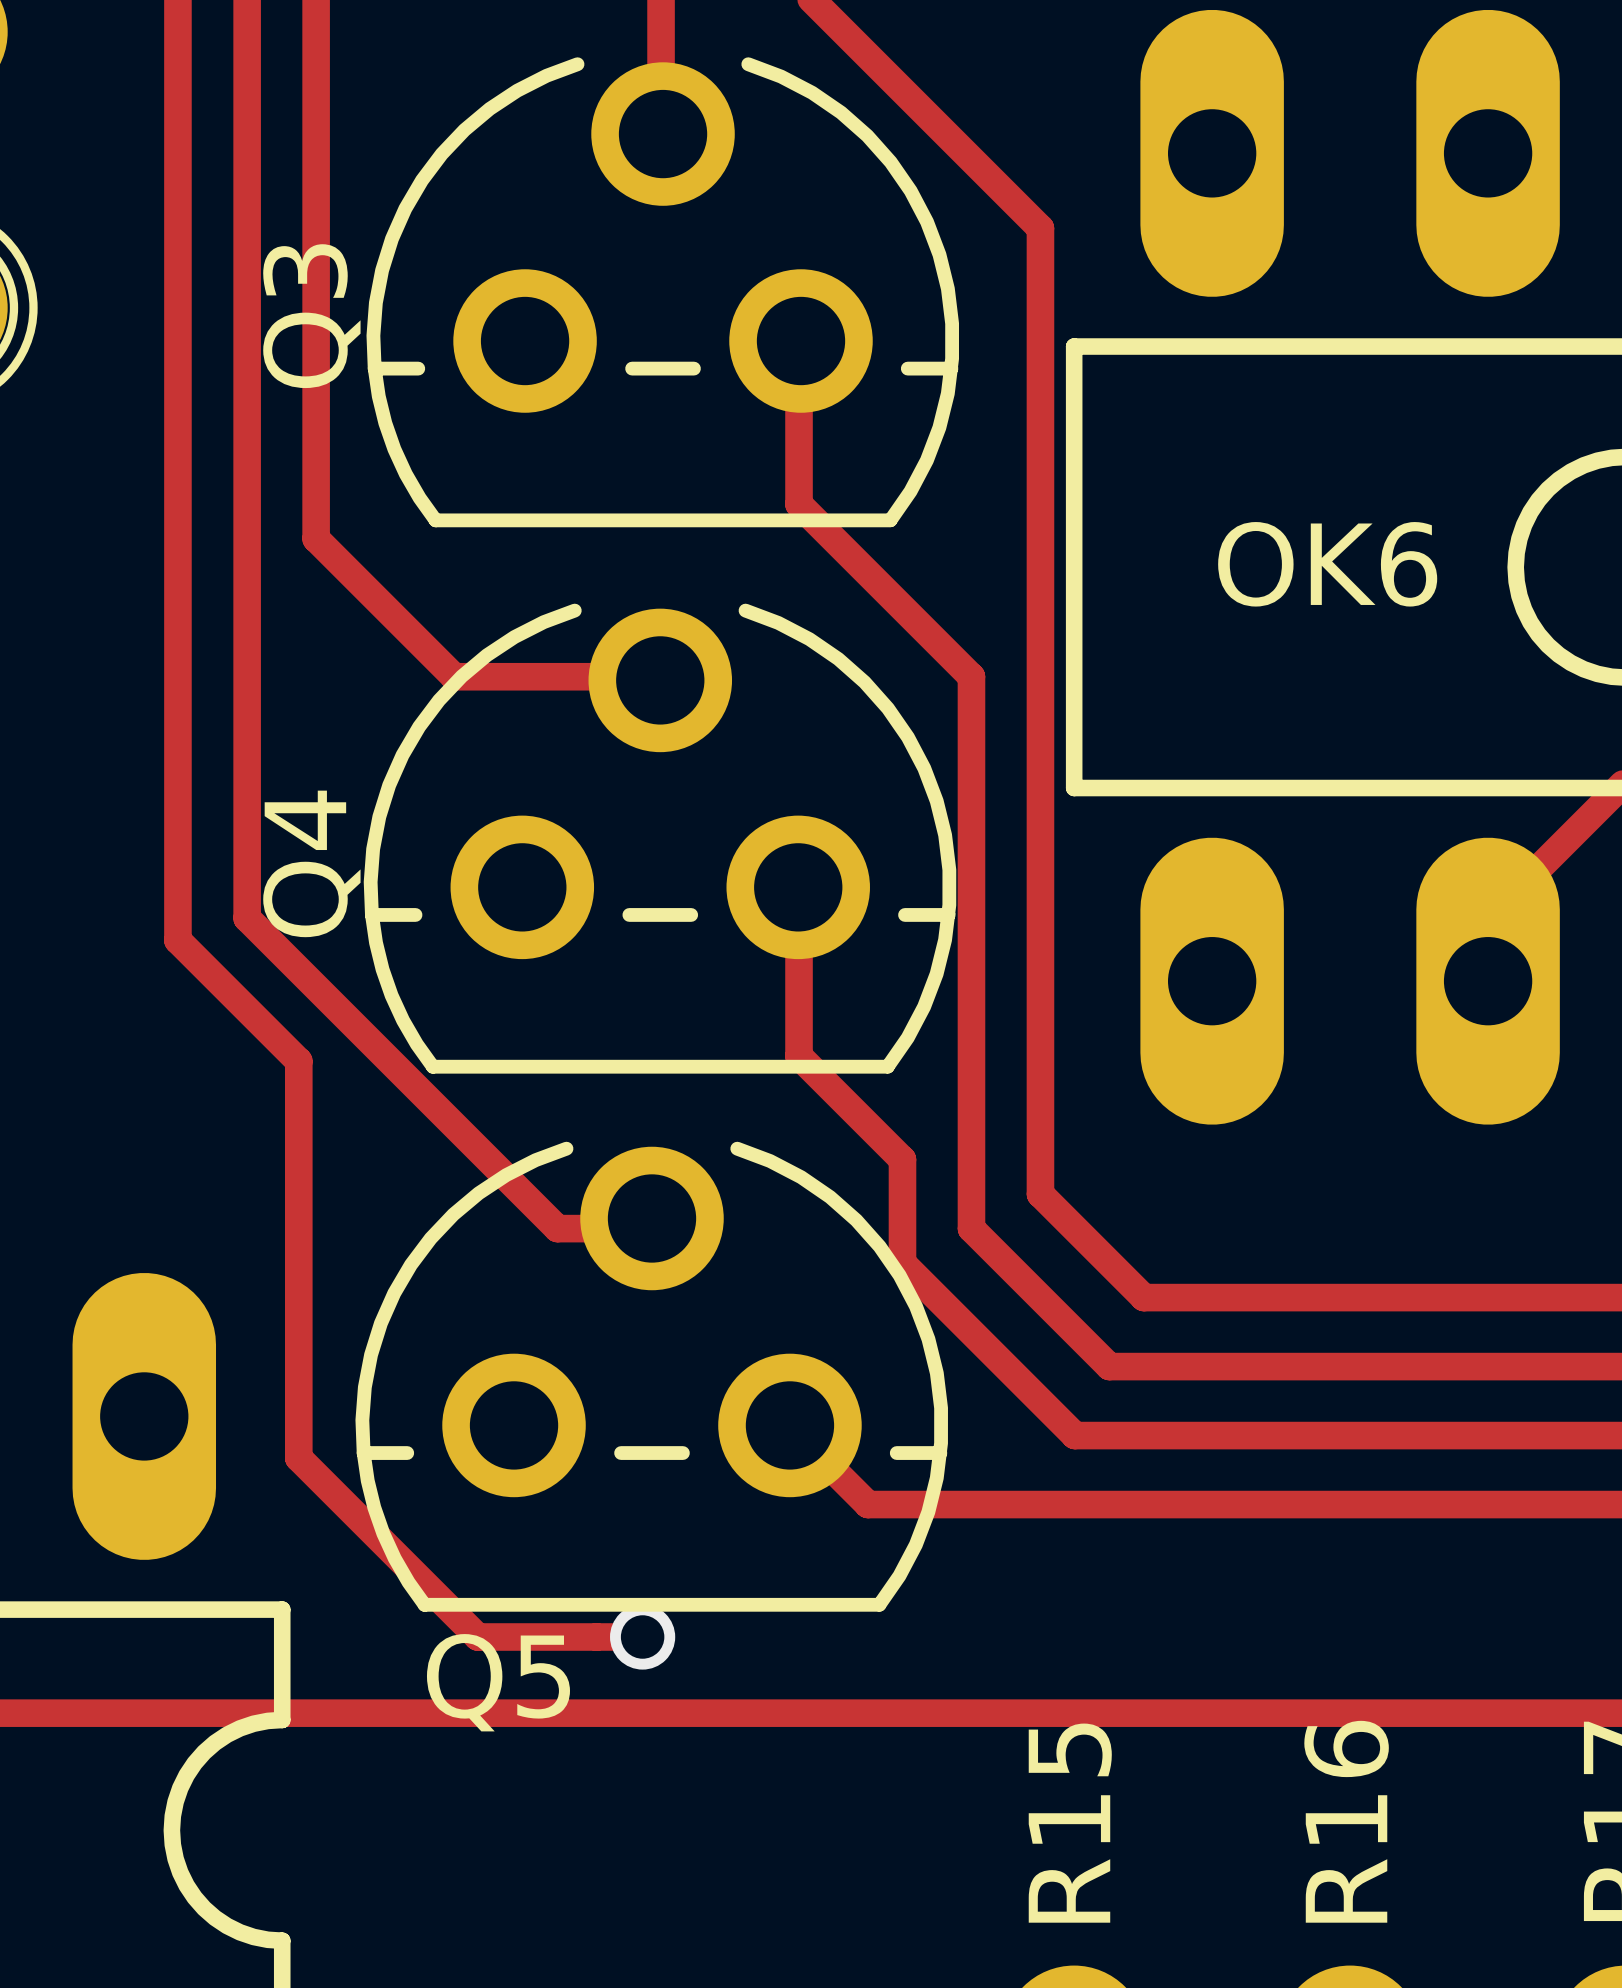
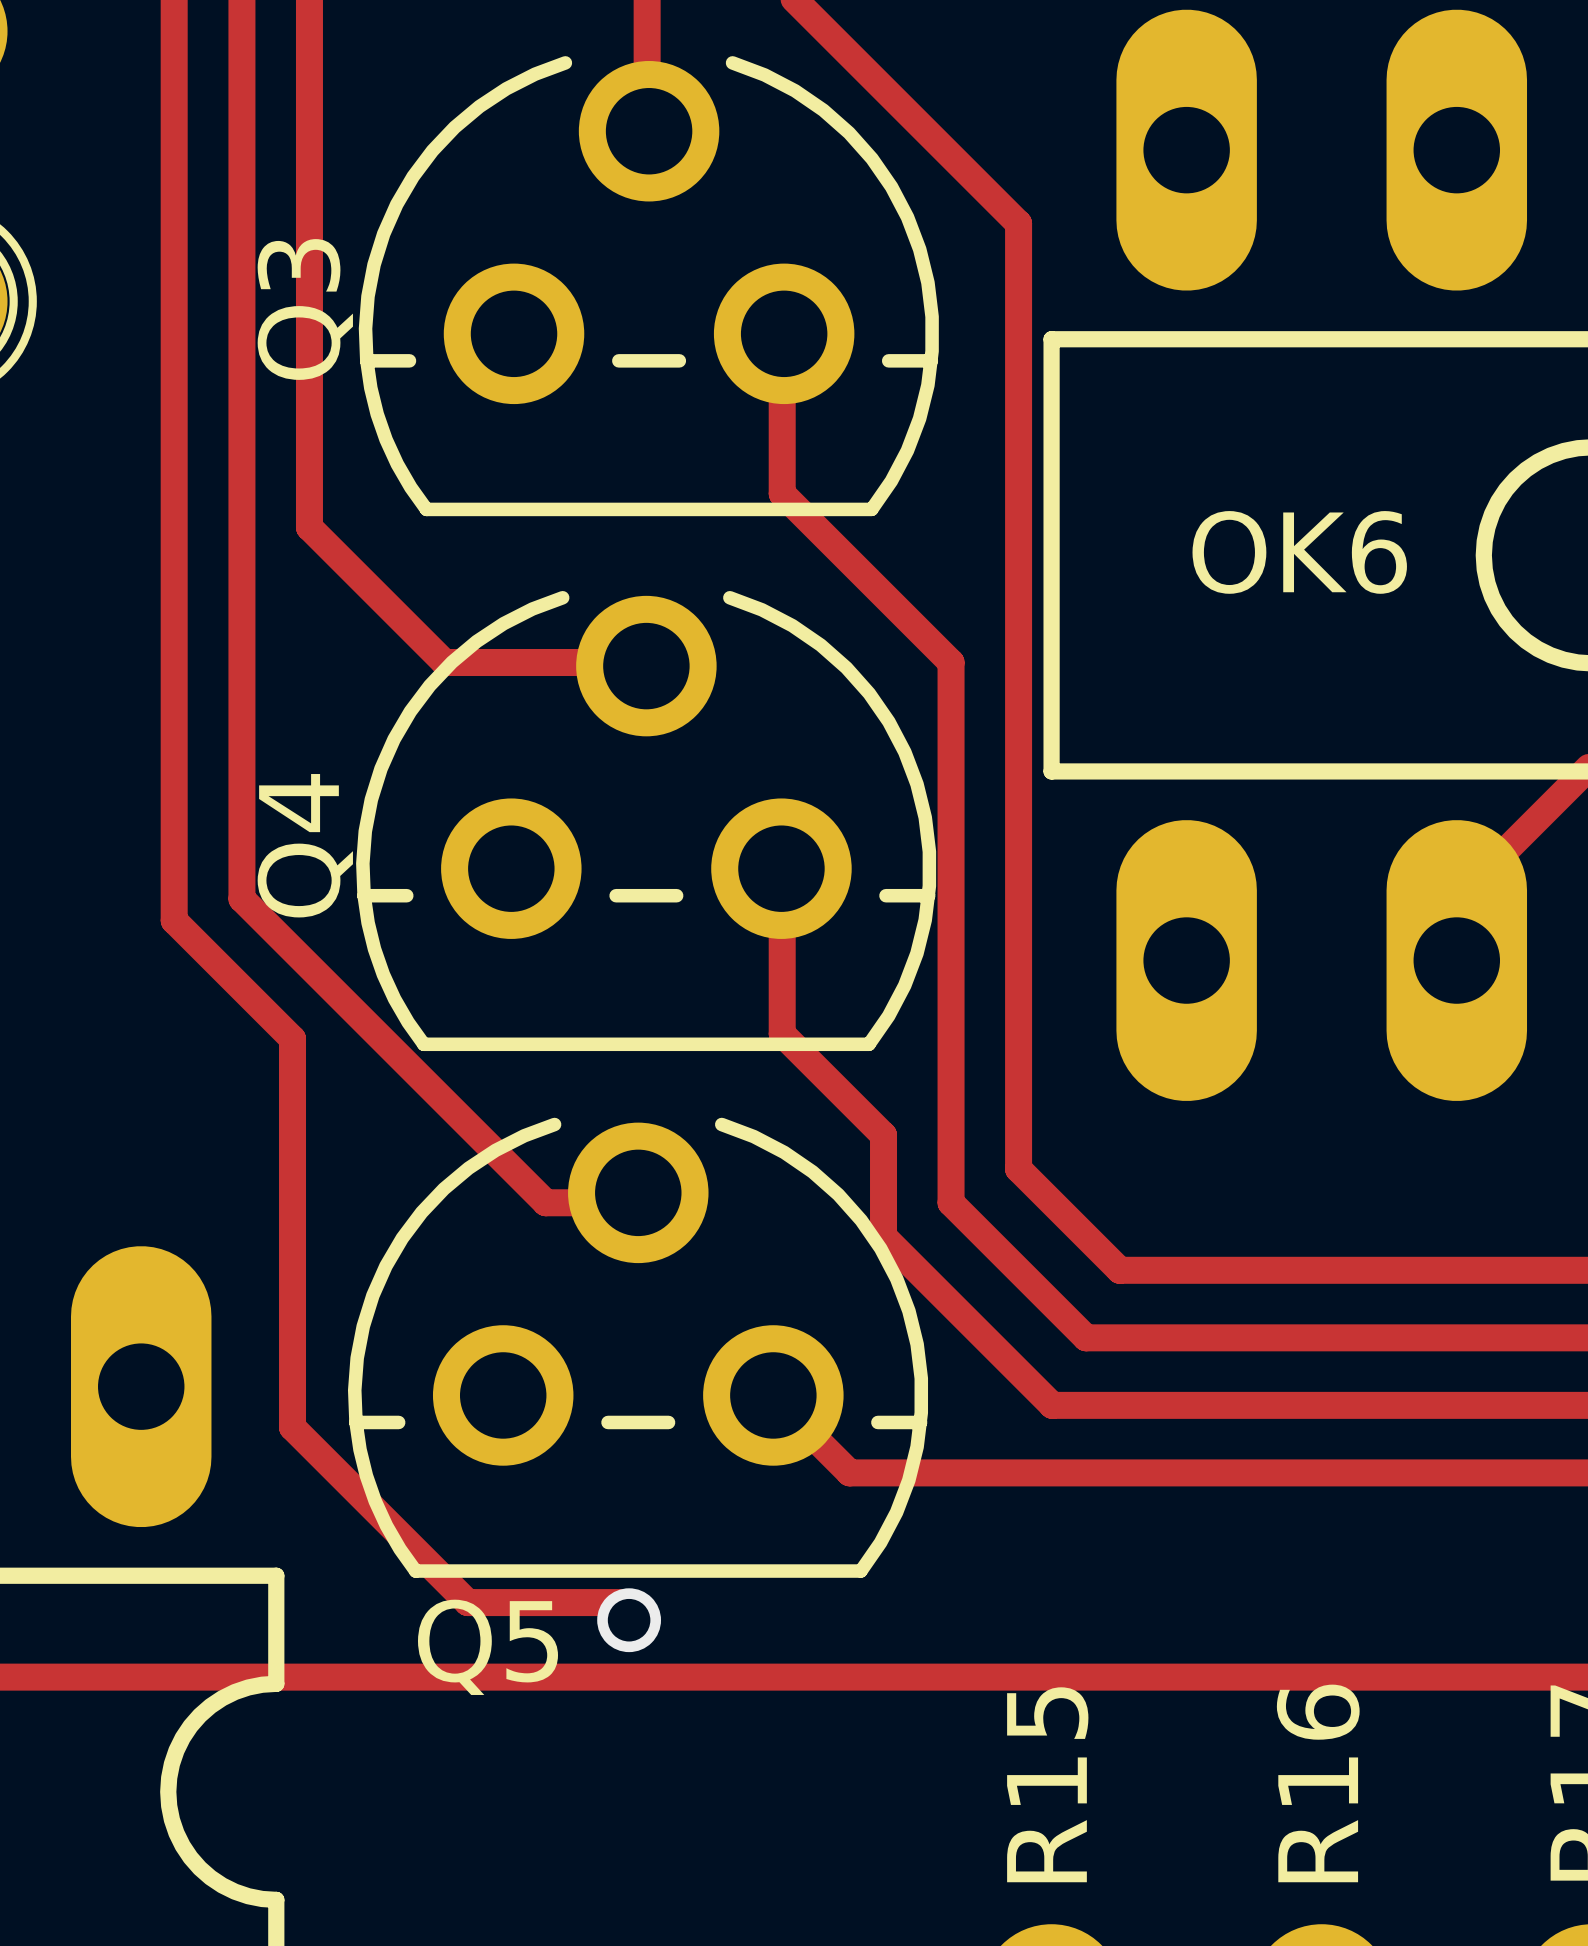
via position: (642, 1637) -> (629, 1620)

